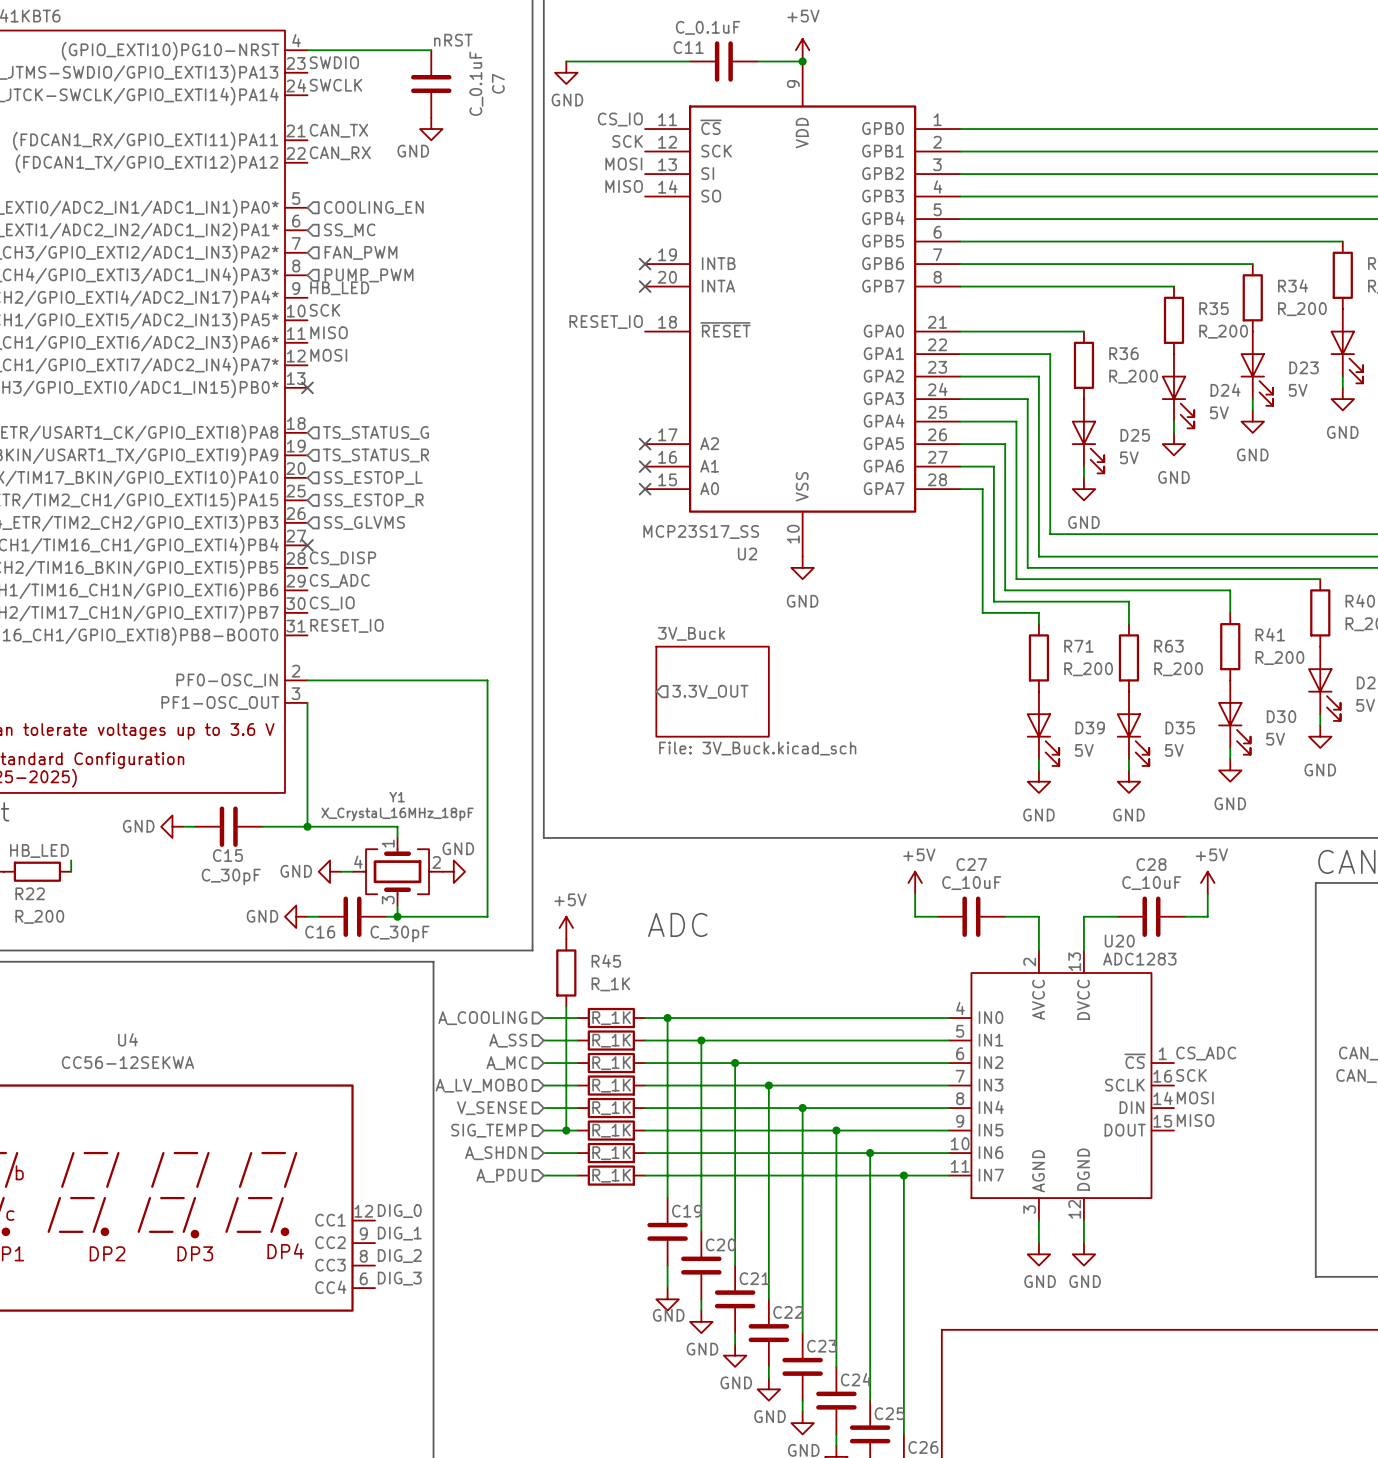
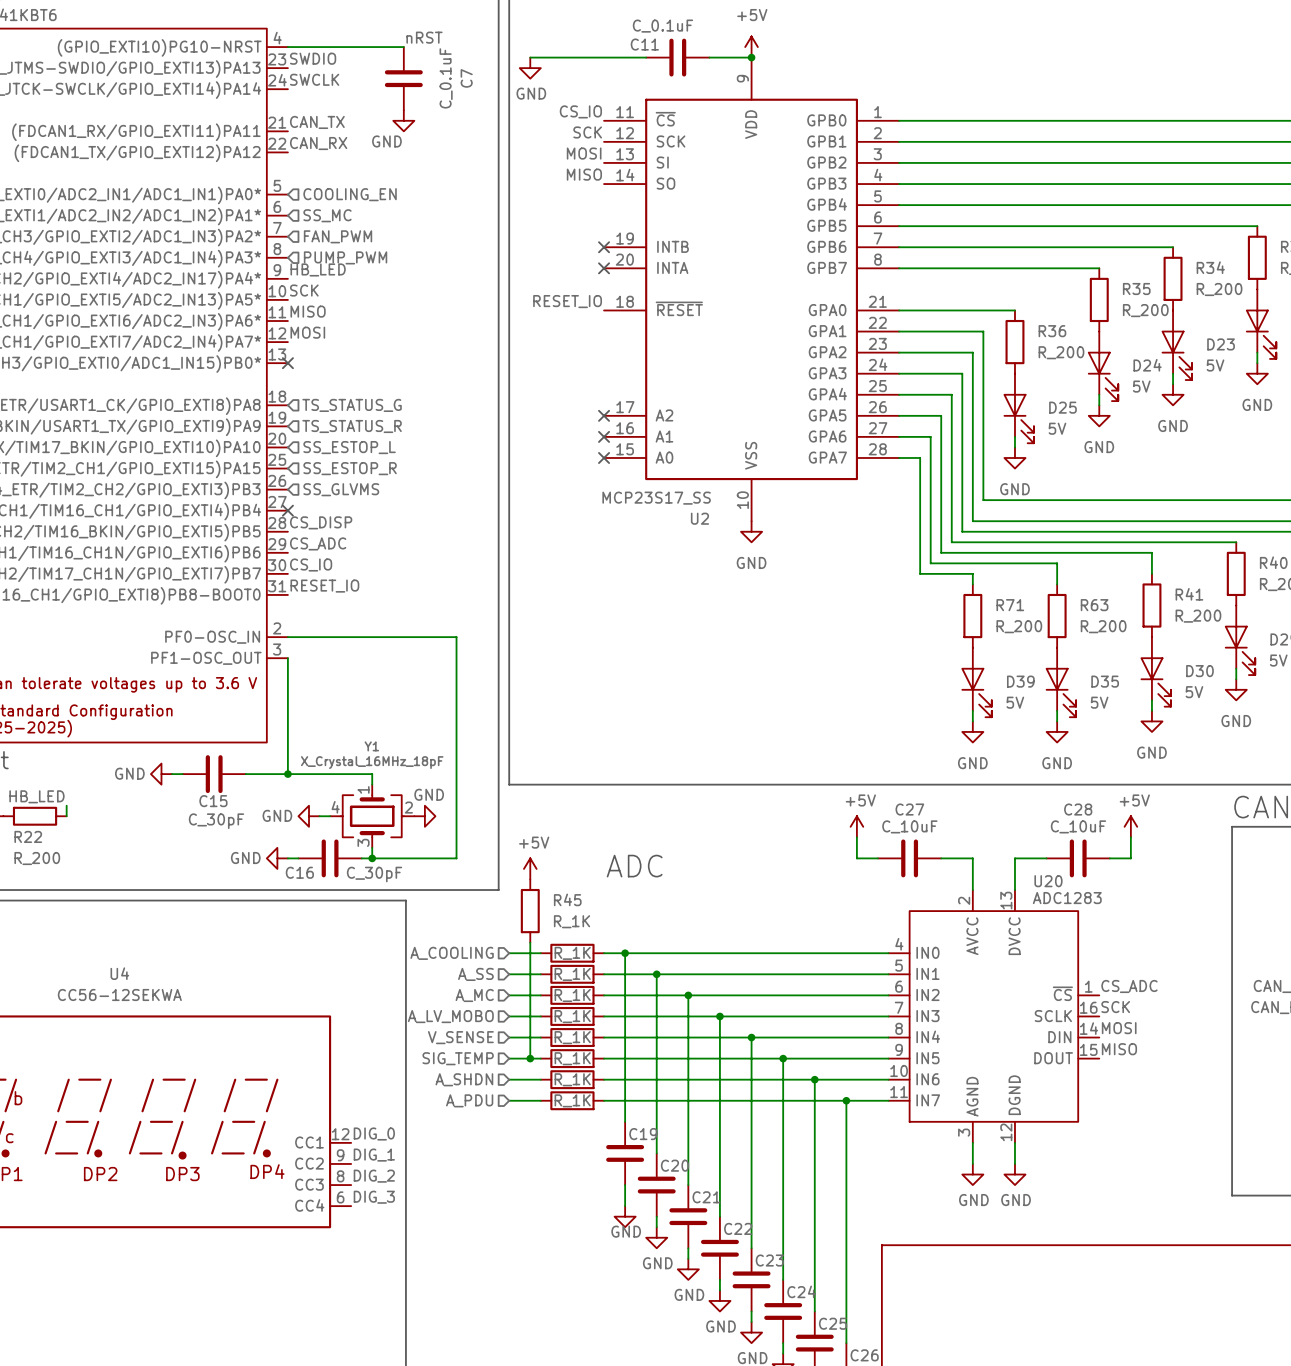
hierarchical label: 3.3V_OUT (710, 691) -> none
sheet 3V_Buck: File: 3V_Buck.kicad_sch (712, 691) -> none

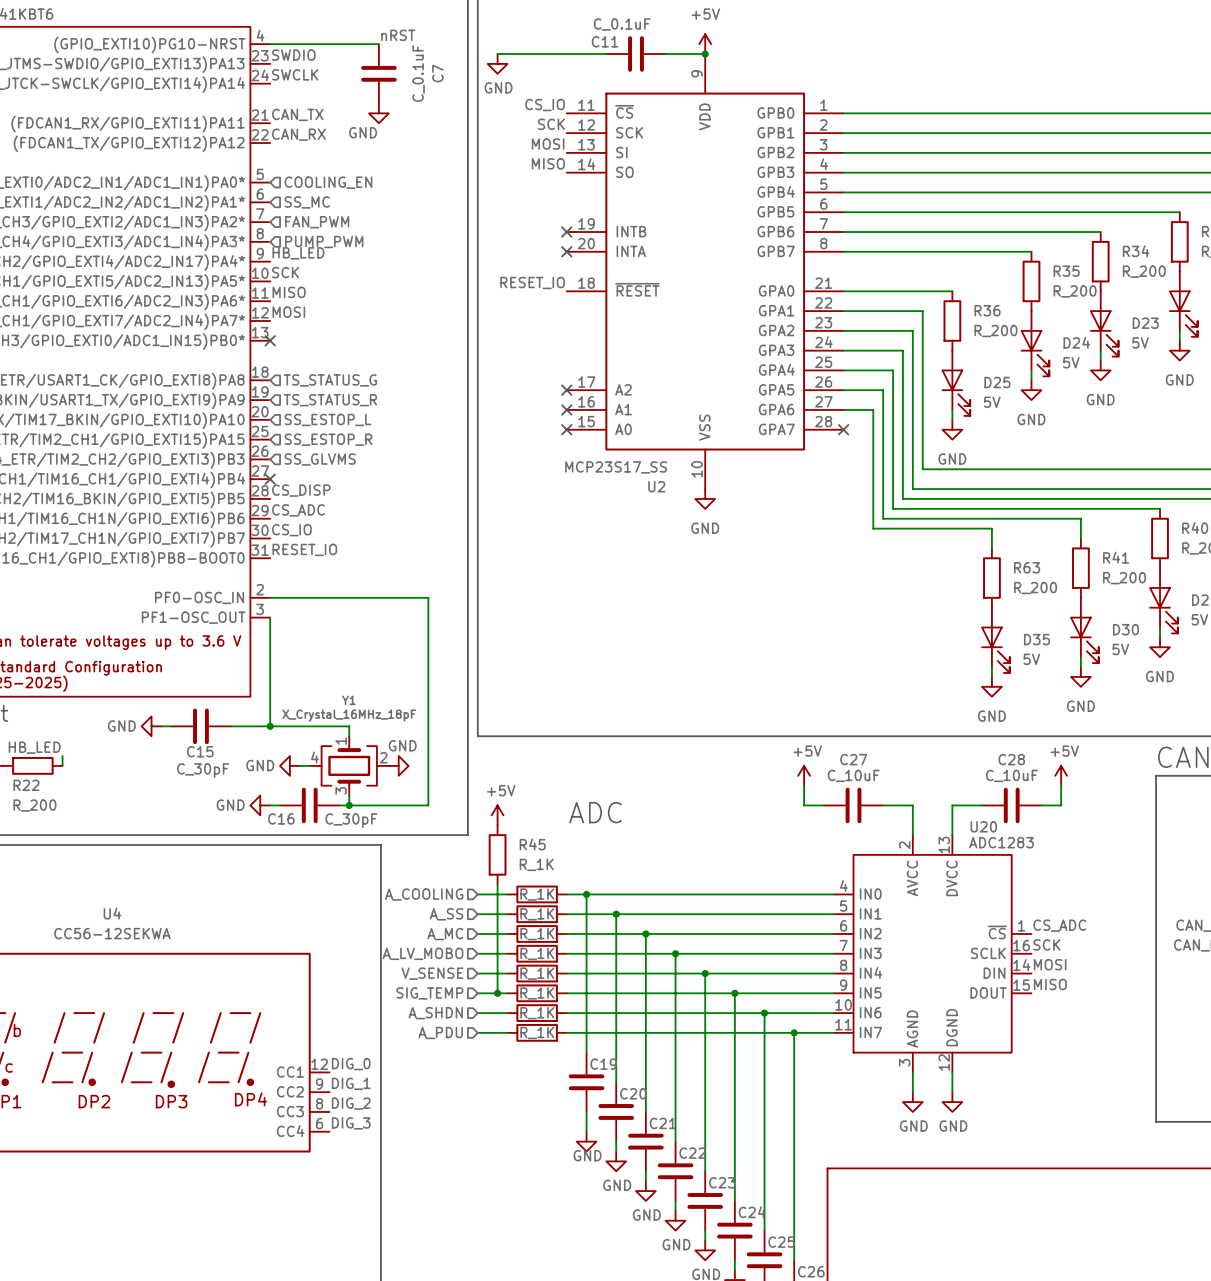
wire: (899, 457) (920, 457) (920, 573) (972, 573) (972, 584) -> none
no-connect mark: none -> (843, 429)
R71: R_200 (972, 616) -> none
D39: 5V (976, 682) -> none
wire: (972, 710) (972, 721) -> none
power symbol: GND (972, 731) -> none

